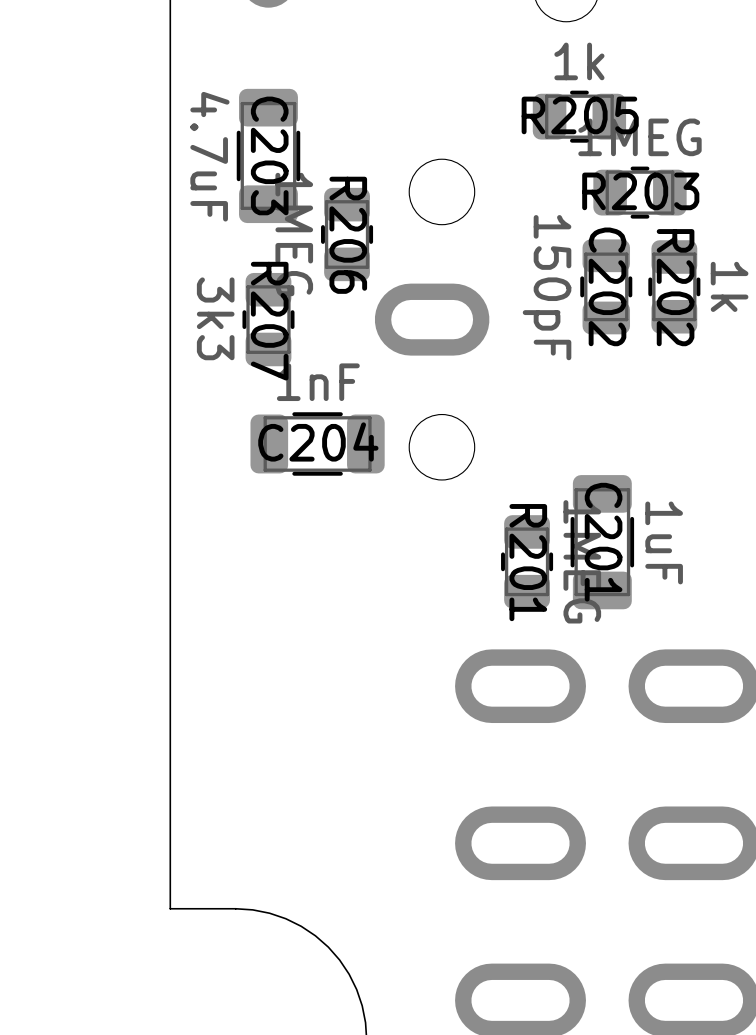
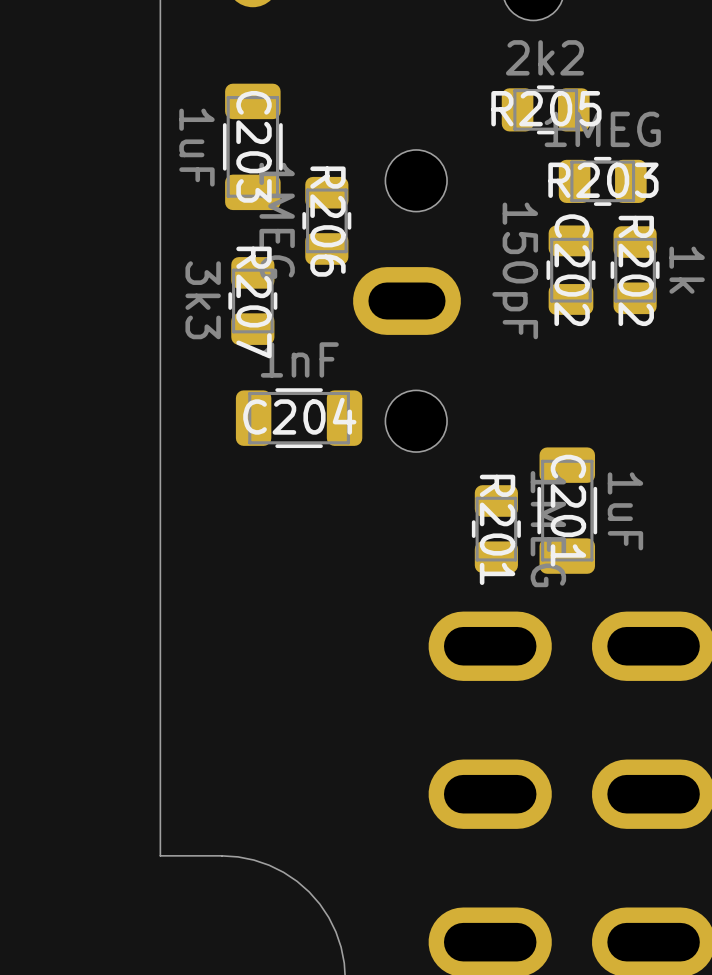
R205 value: 1k (579, 61) -> 2k2 (544, 57)
C203 value: 4.7uF (209, 156) -> 1uF (196, 147)

